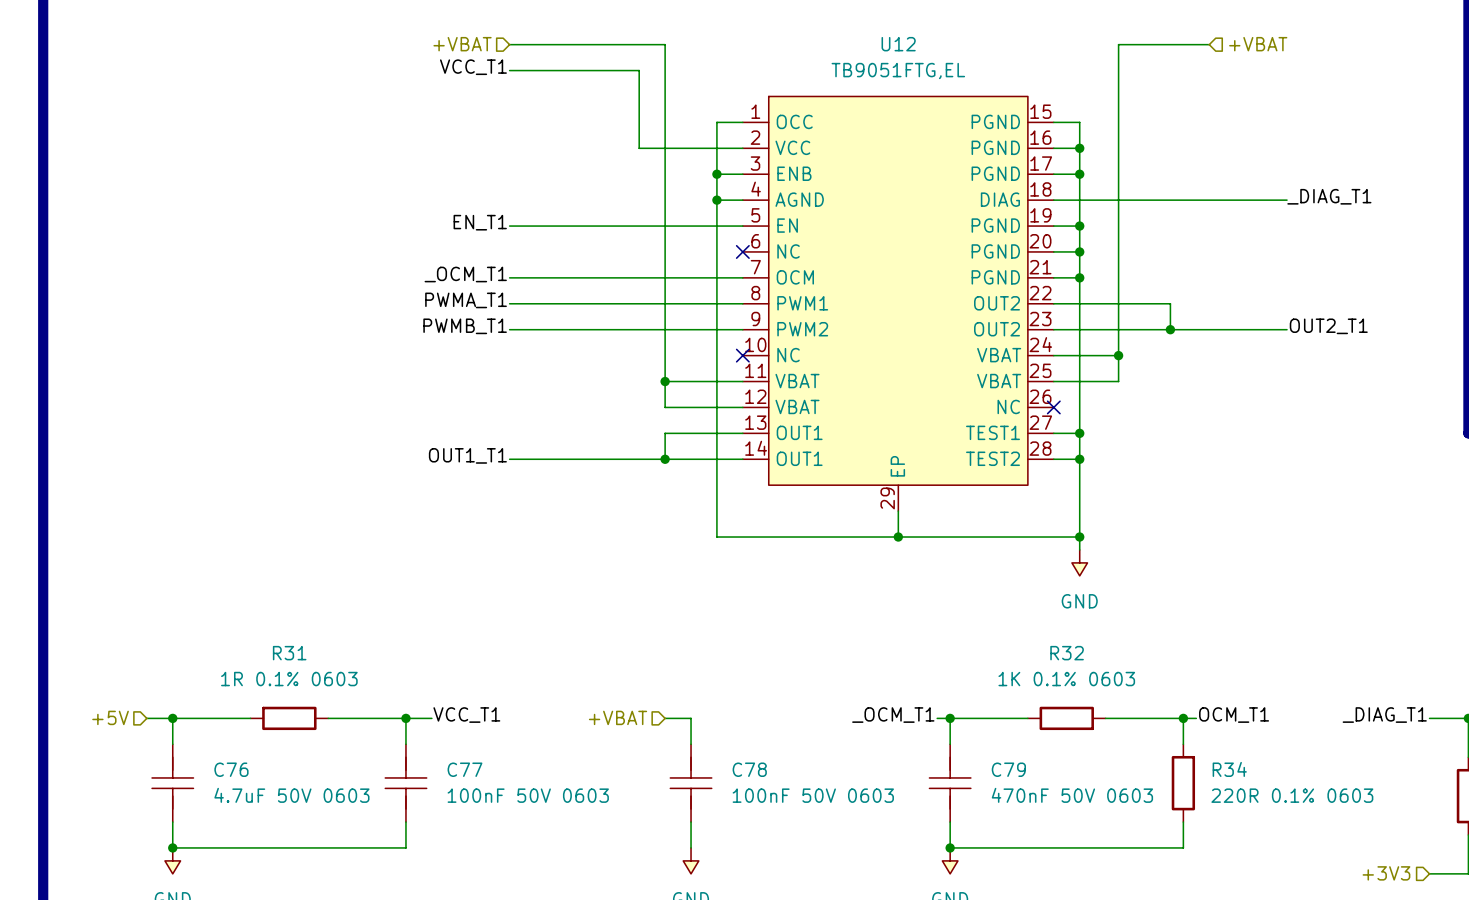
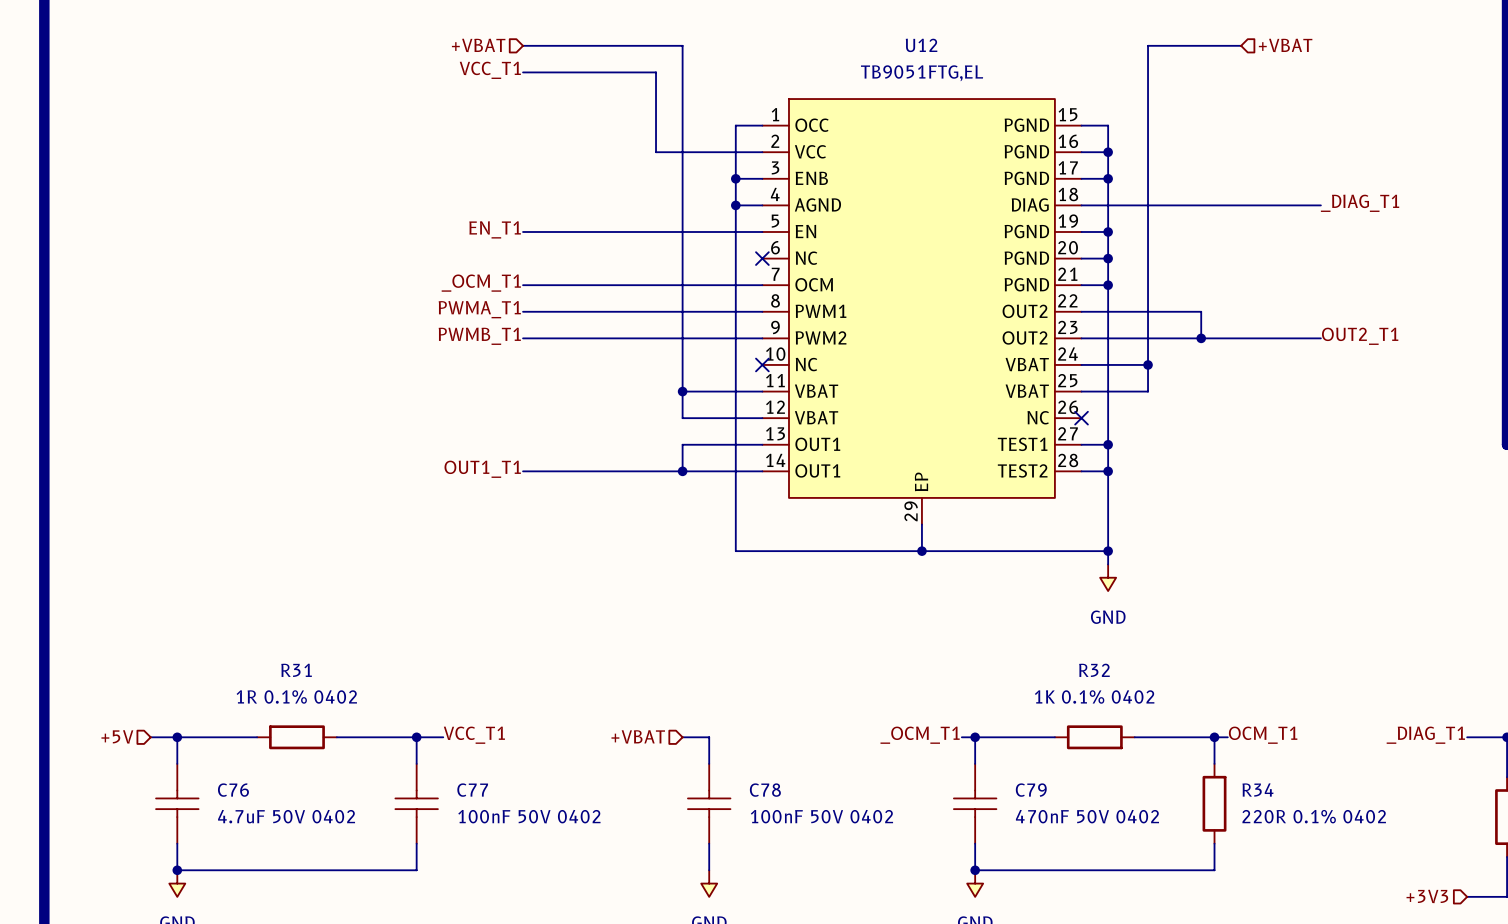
R31 value: 1R 0.1% 0603 (289, 679) -> 1R 0.1% 0402 (296, 696)
R32 value: 1K 0.1% 0603 (1066, 679) -> 1K 0.1% 0402 (1094, 696)
C76 symbol: [152, 744, 194, 823] -> [156, 763, 199, 844]
C77 symbol: [385, 744, 427, 823] -> [395, 763, 438, 844]
C78 symbol: [670, 744, 712, 823] -> [687, 763, 731, 844]
C79 symbol: [929, 744, 971, 823] -> [953, 763, 997, 844]
C76 value: 4.7uF 50V 0603 (291, 795) -> 4.7uF 50V 0402 (286, 816)
C77 value: 100nF 50V 0603 (528, 795) -> 100nF 50V 0402 (529, 816)
C78 value: 100nF 50V 0603 (813, 795) -> 100nF 50V 0402 (821, 816)
C79 value: 470nF 50V 0603 (1072, 795) -> 470nF 50V 0402 (1087, 816)
R34 value: 220R 0.1% 0603 (1292, 795) -> 220R 0.1% 0402 (1314, 816)

